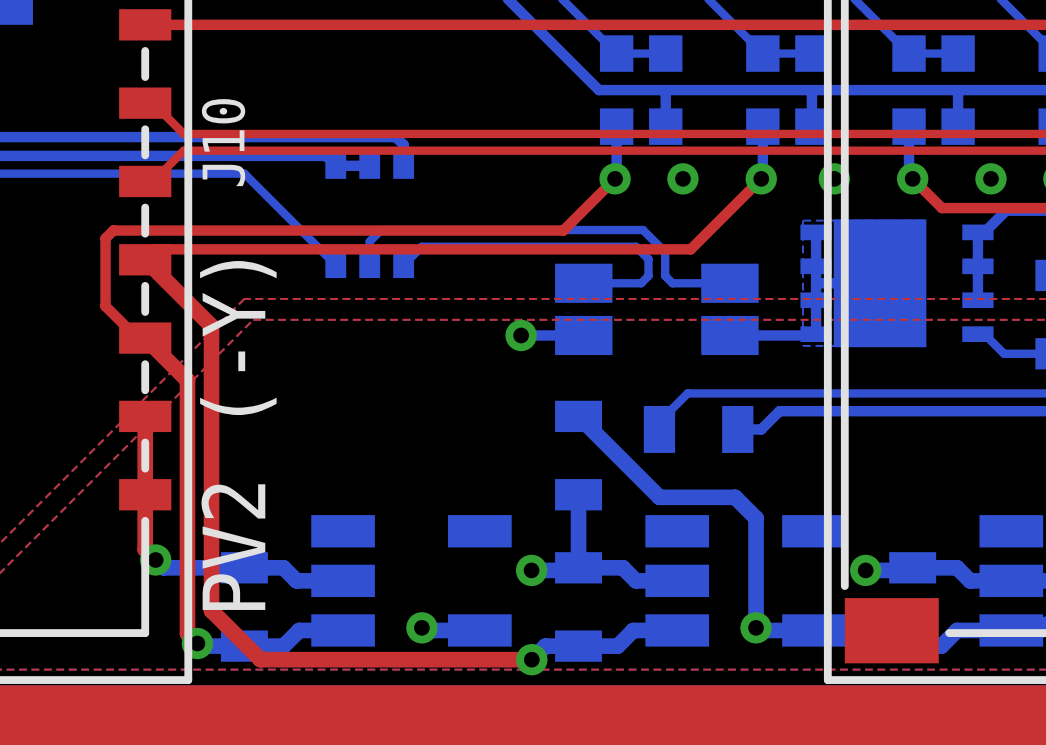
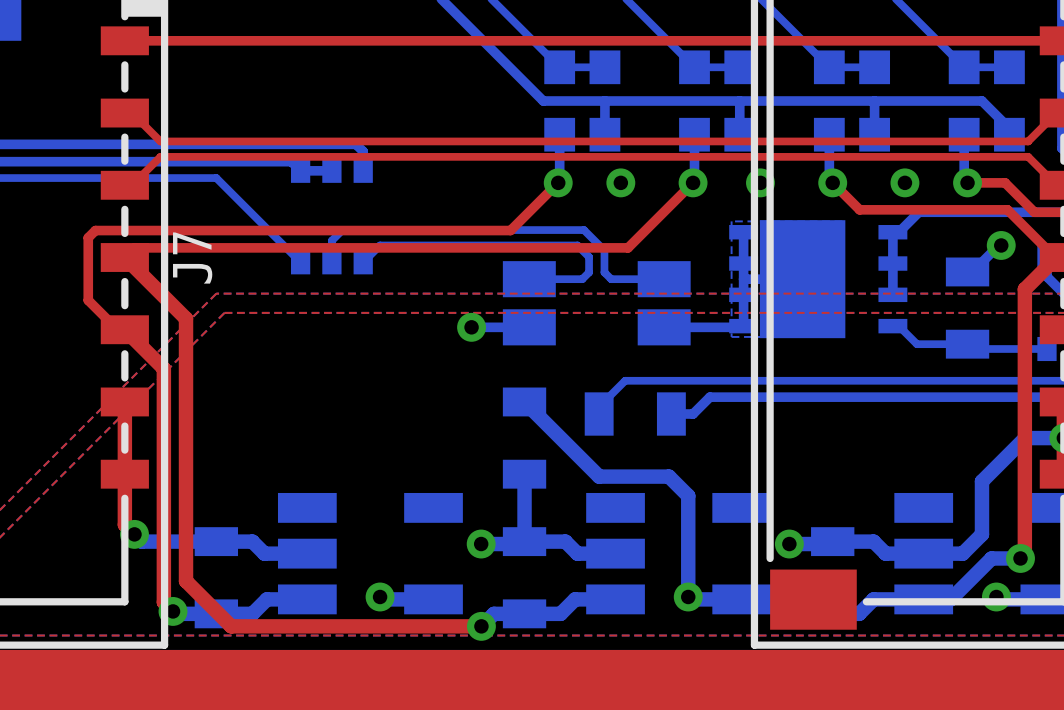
J10 name: J10 (223, 142) -> J7 (192, 258)
text: PV2 (-Y) (238, 435) -> none

